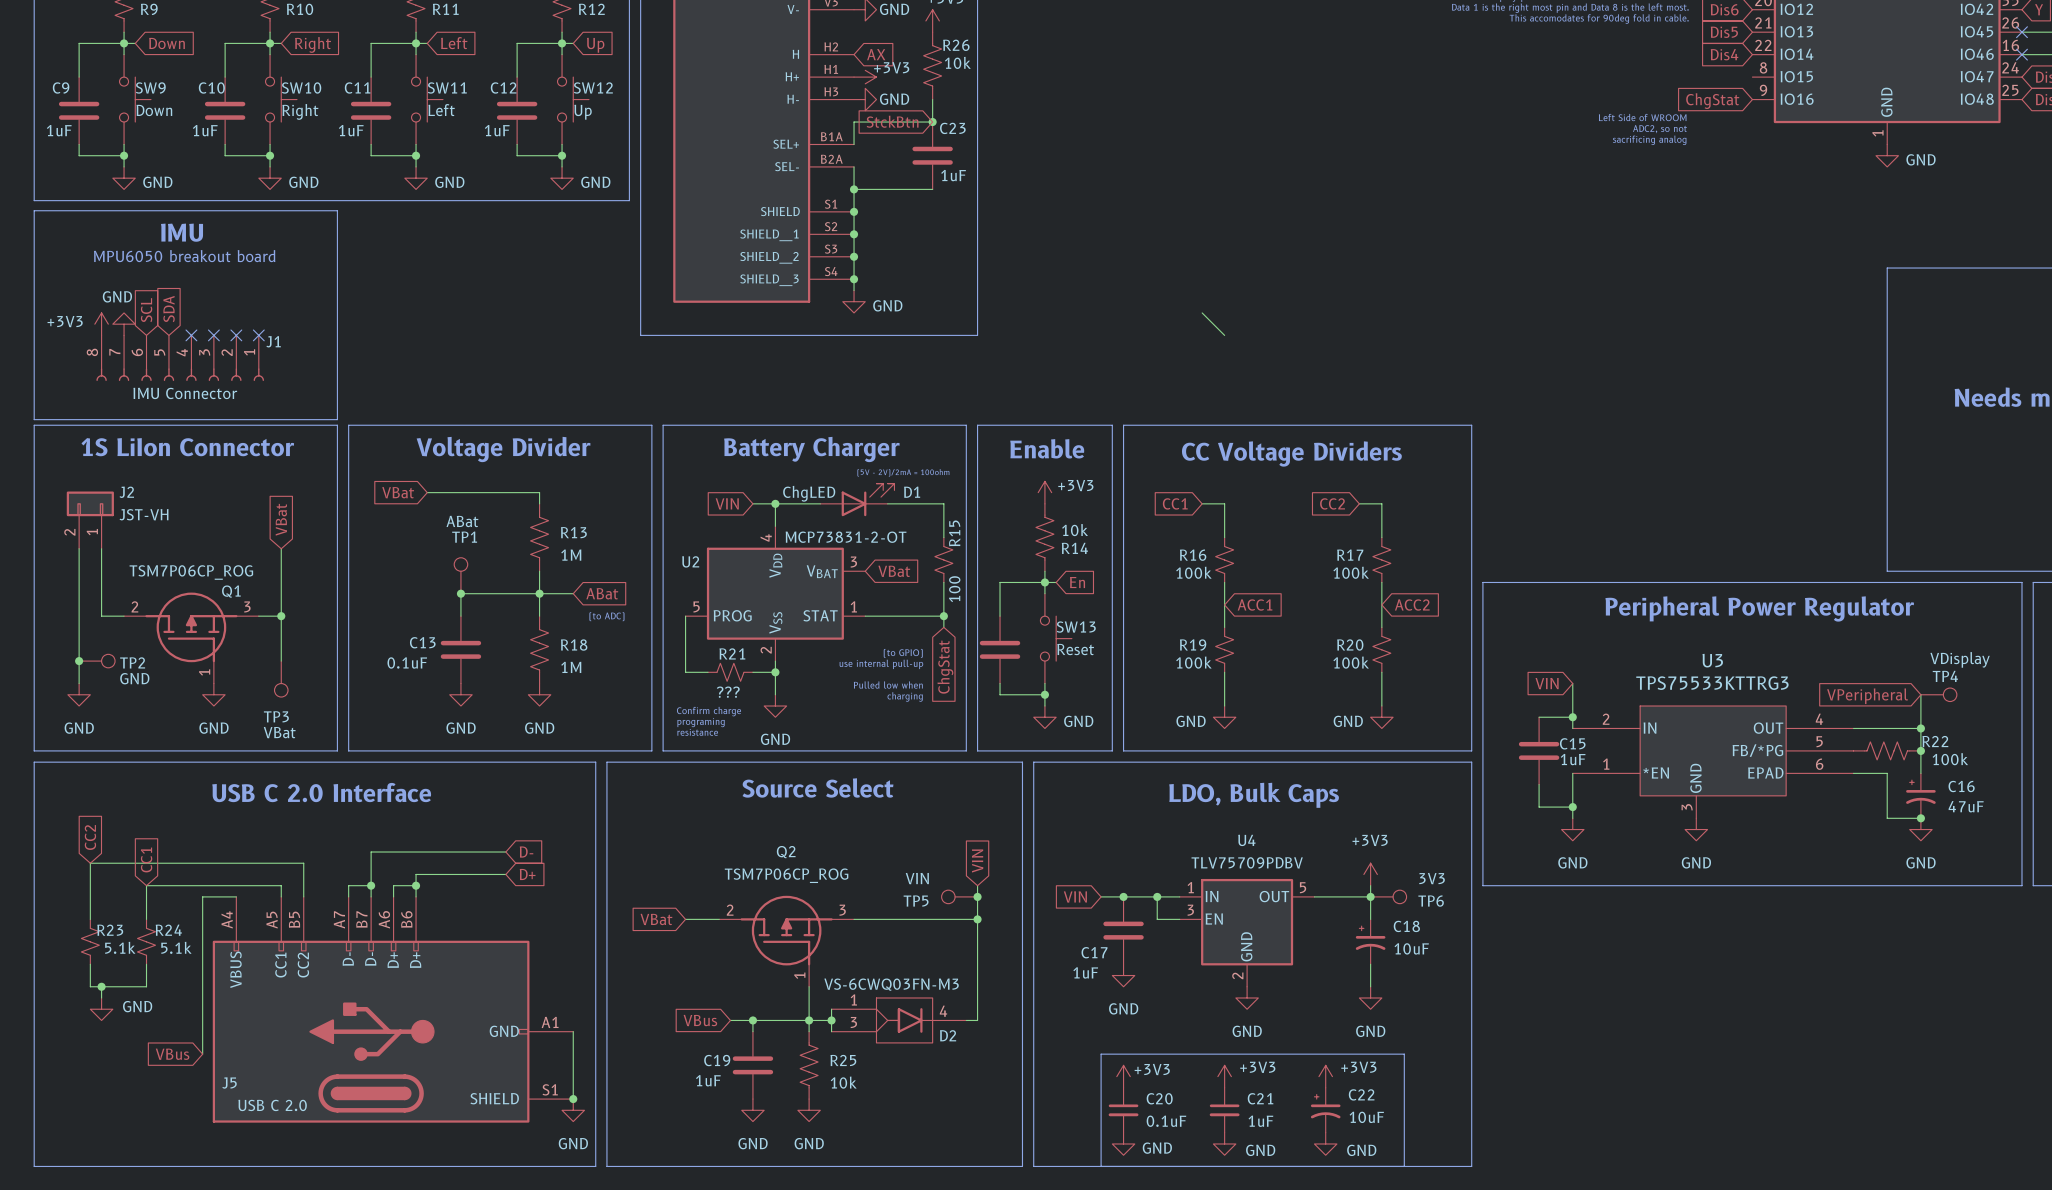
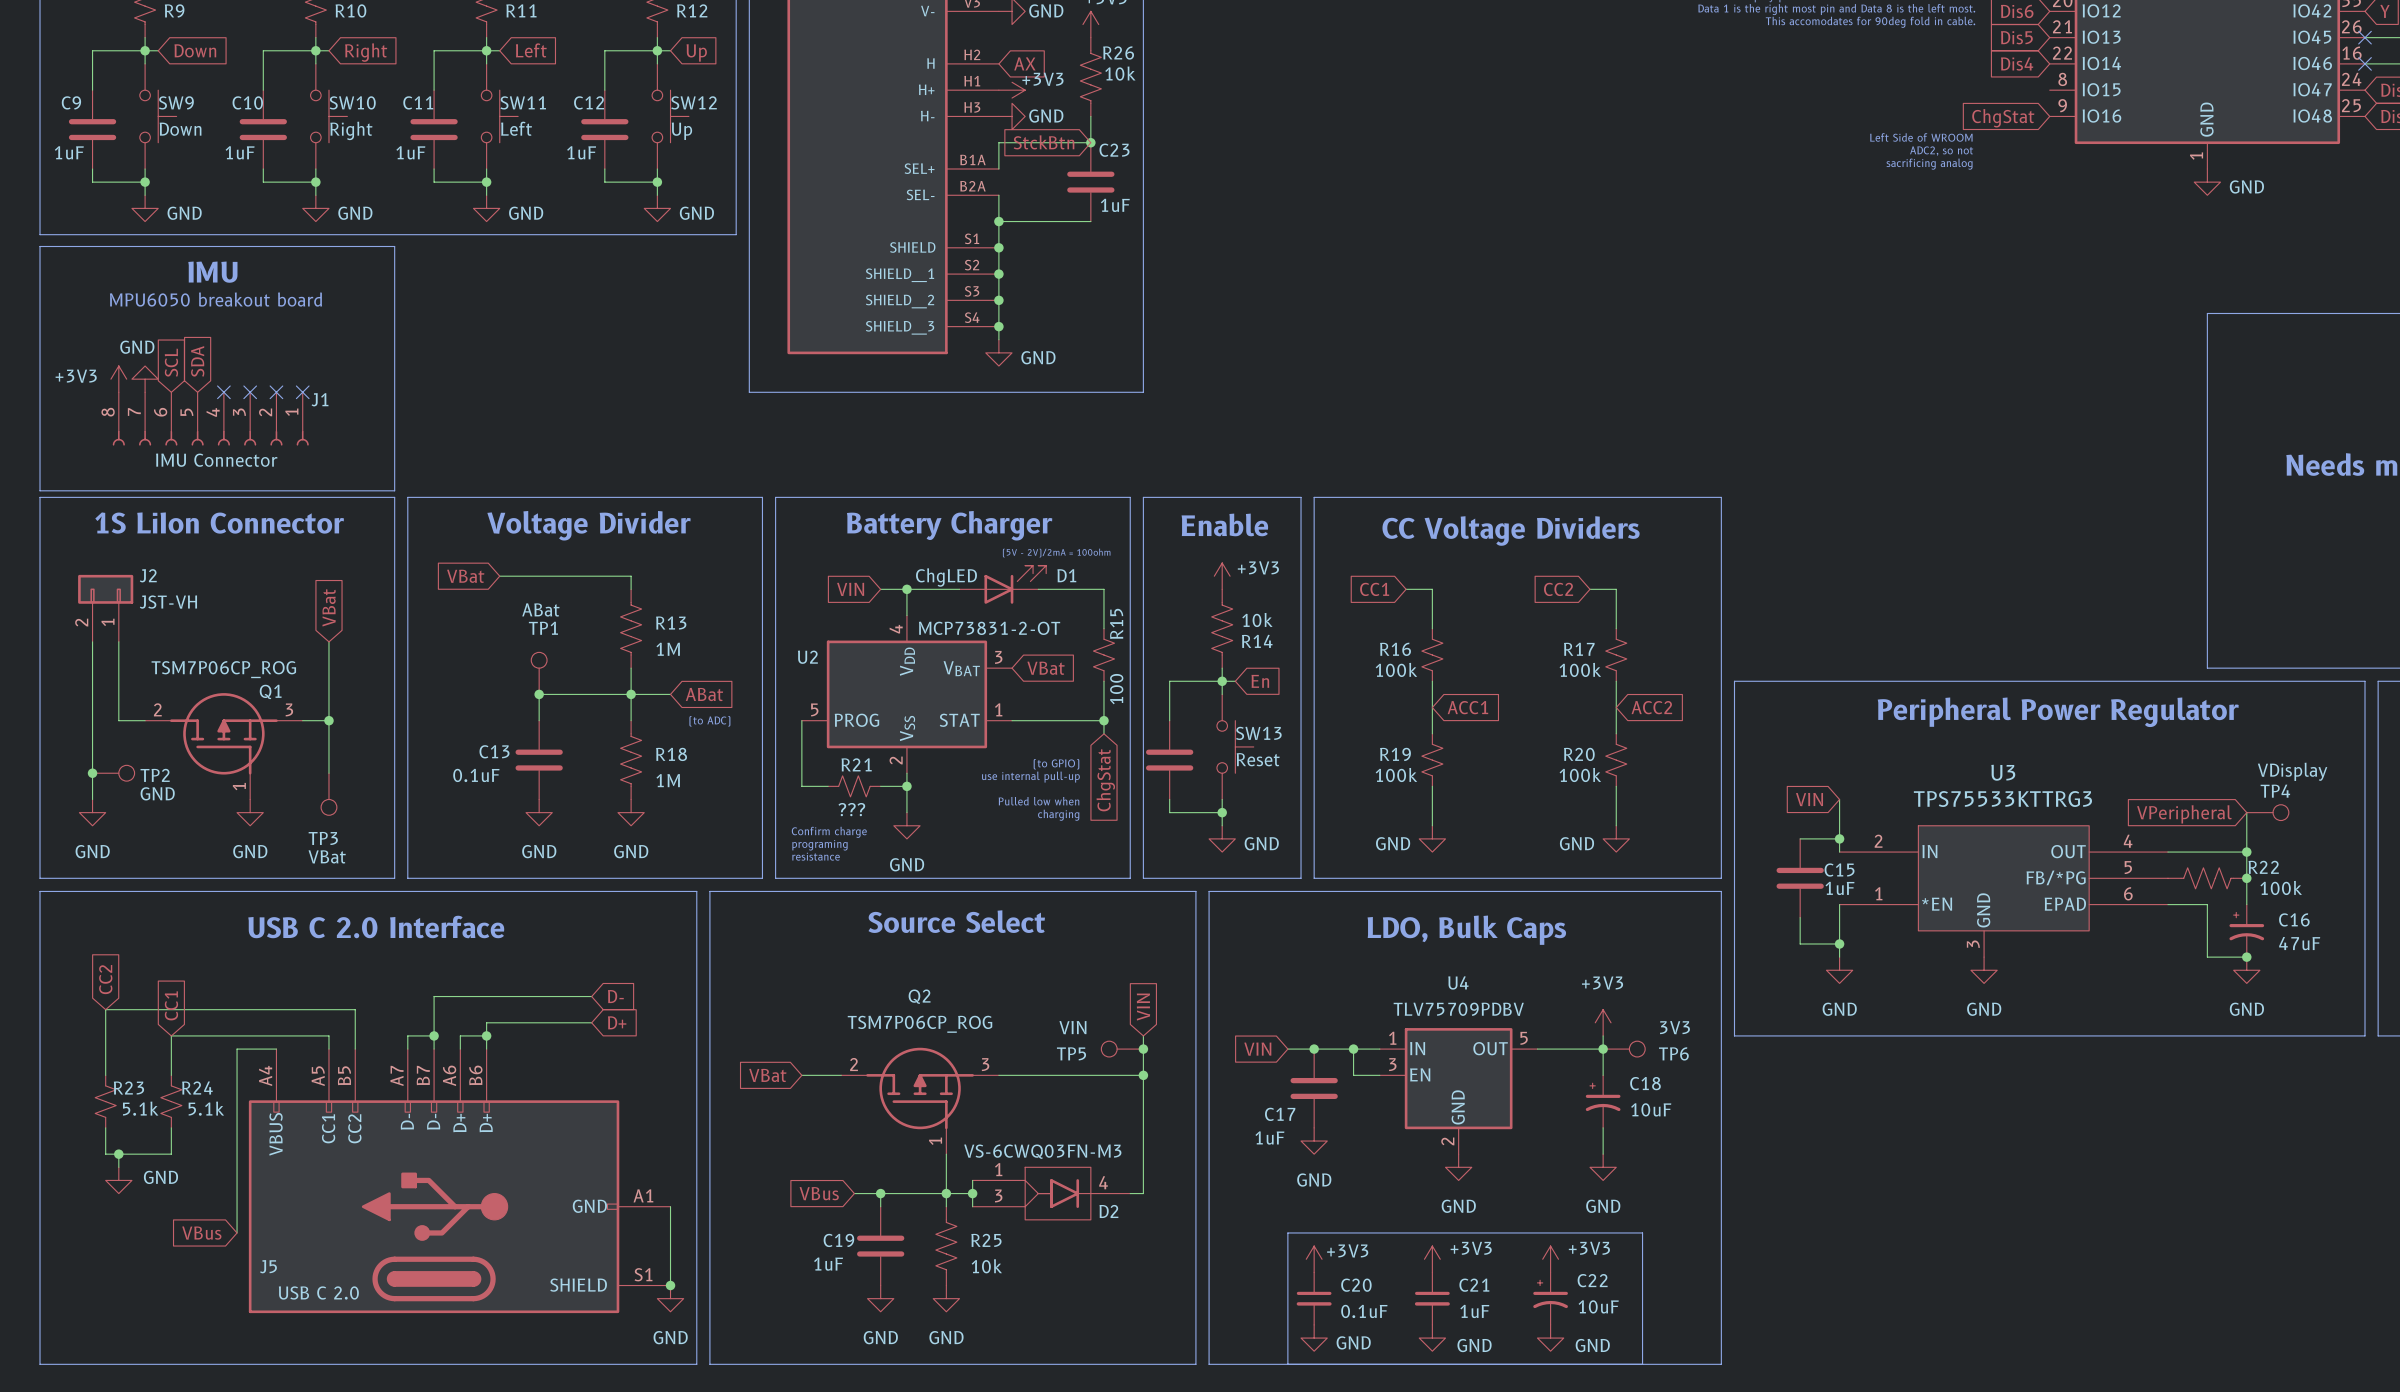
wire: (1202, 312) (1224, 335) -> none

